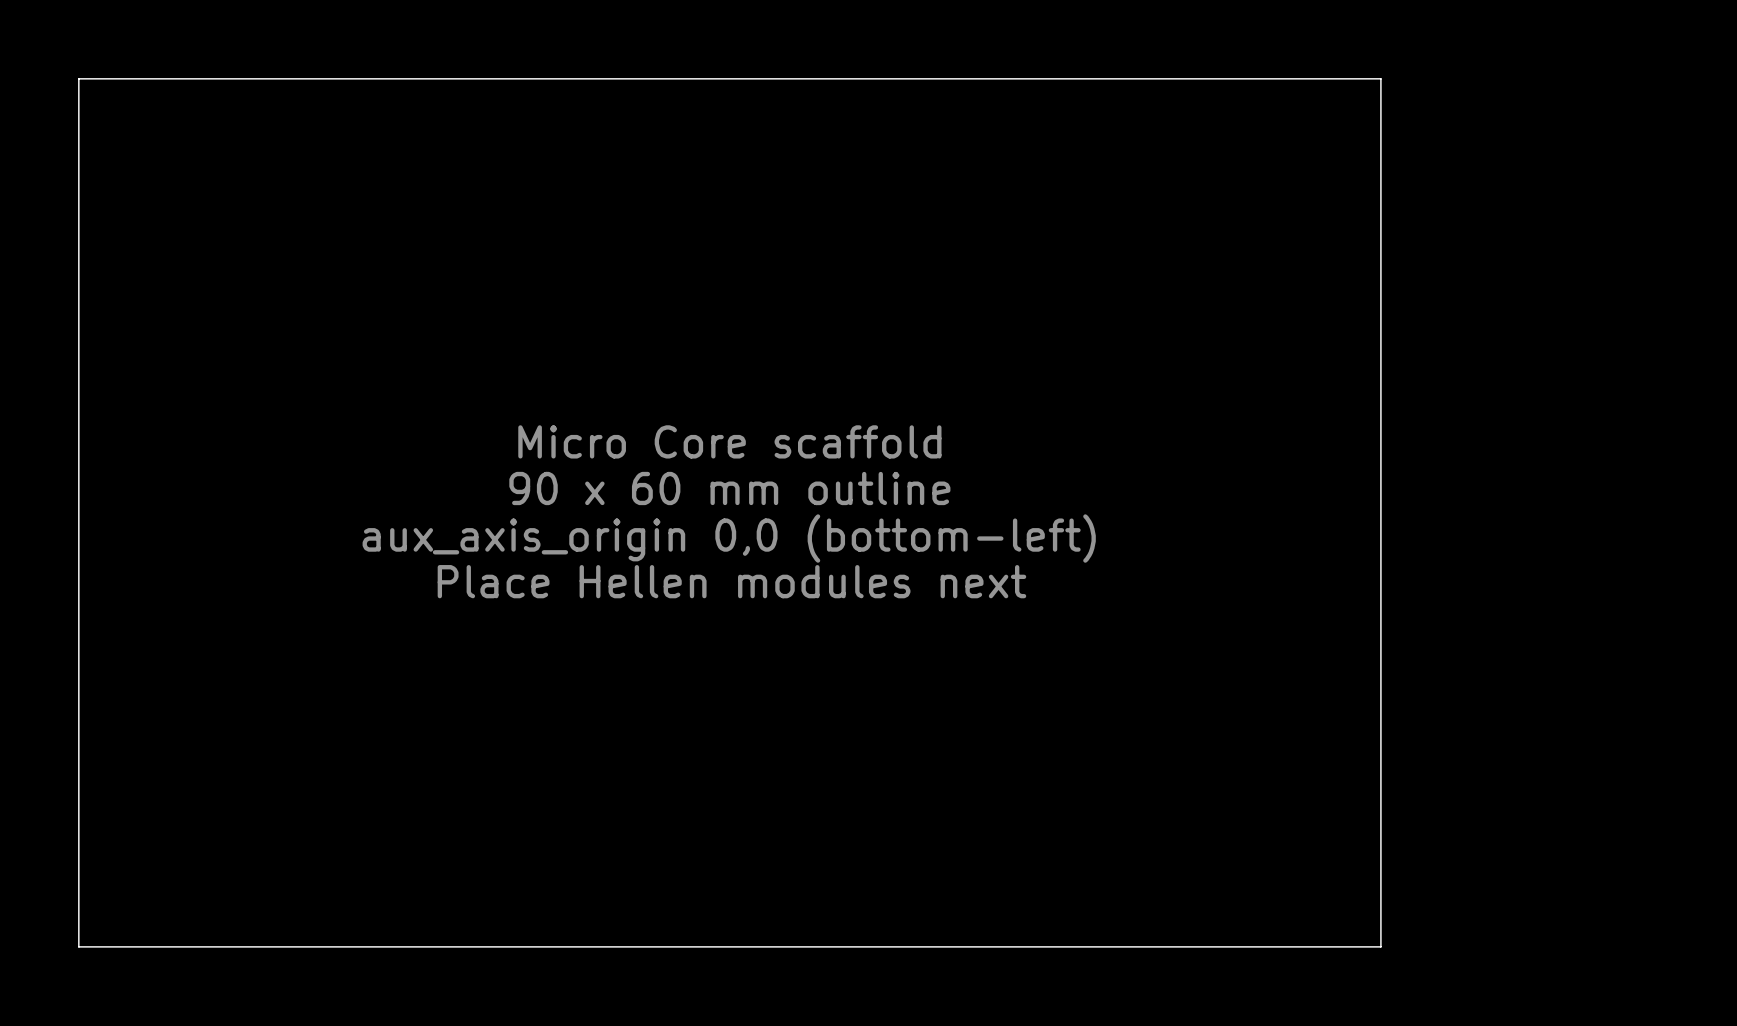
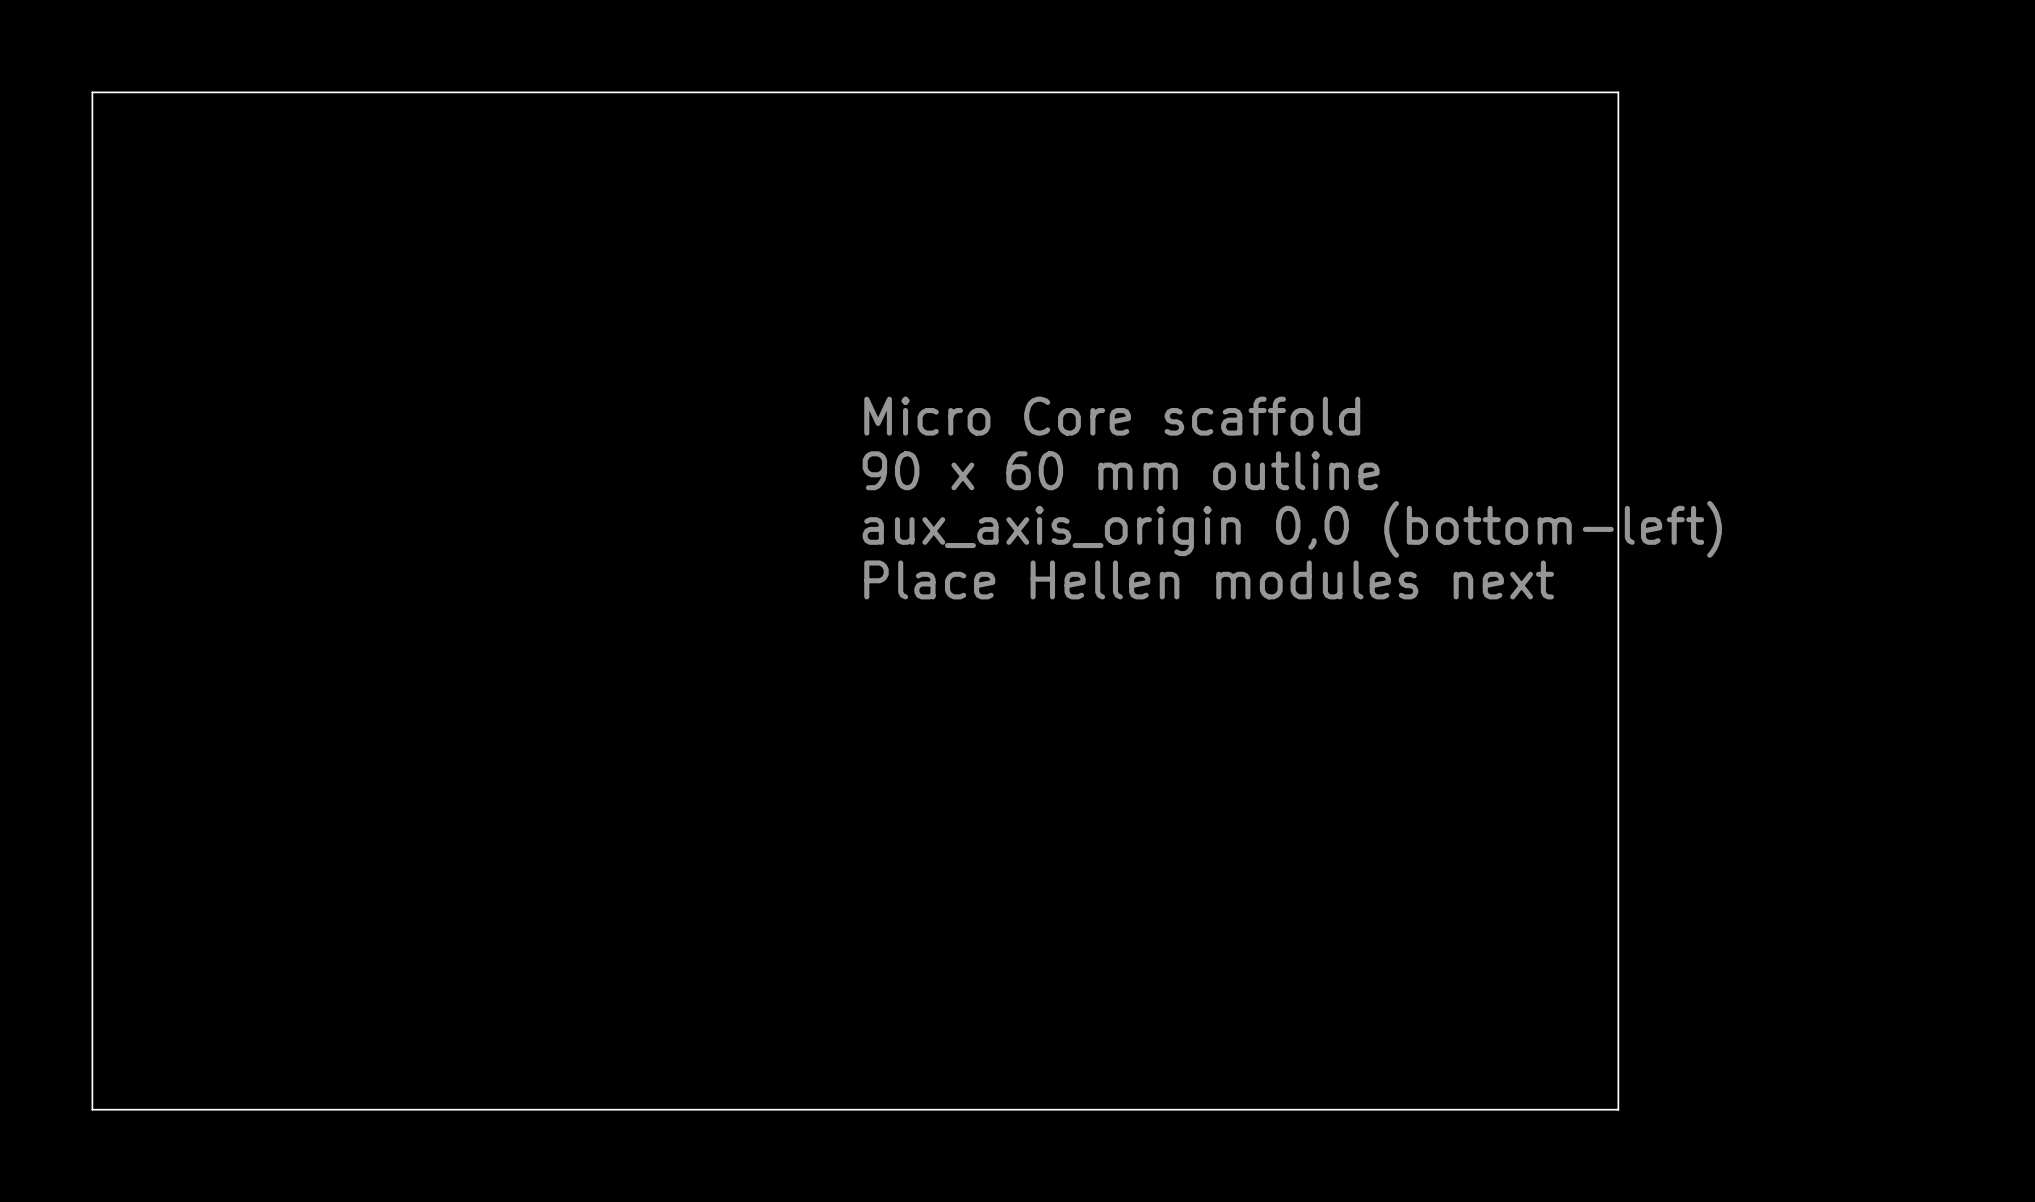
text position: Micro Core scaffold (729, 441) -> Micro Core scaffold (1112, 416)
text position: 90 x 60 mm outline (729, 488) -> 90 x 60 mm outline (1121, 470)
text position: aux_axis_origin 0,0 (bottom-left) (729, 538) -> aux_axis_origin 0,0 (bottom-left) (1292, 529)
text position: Place Hellen modules next (731, 581) -> Place Hellen modules next (1209, 579)

